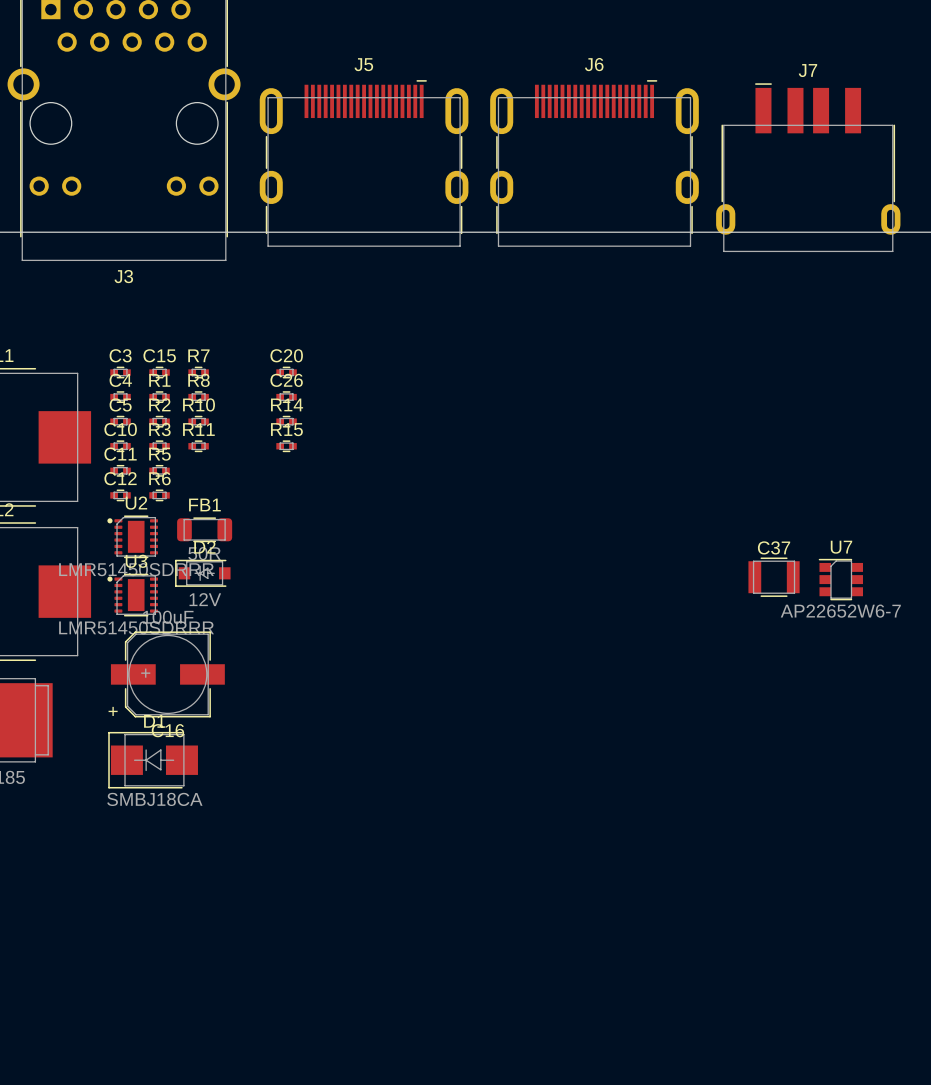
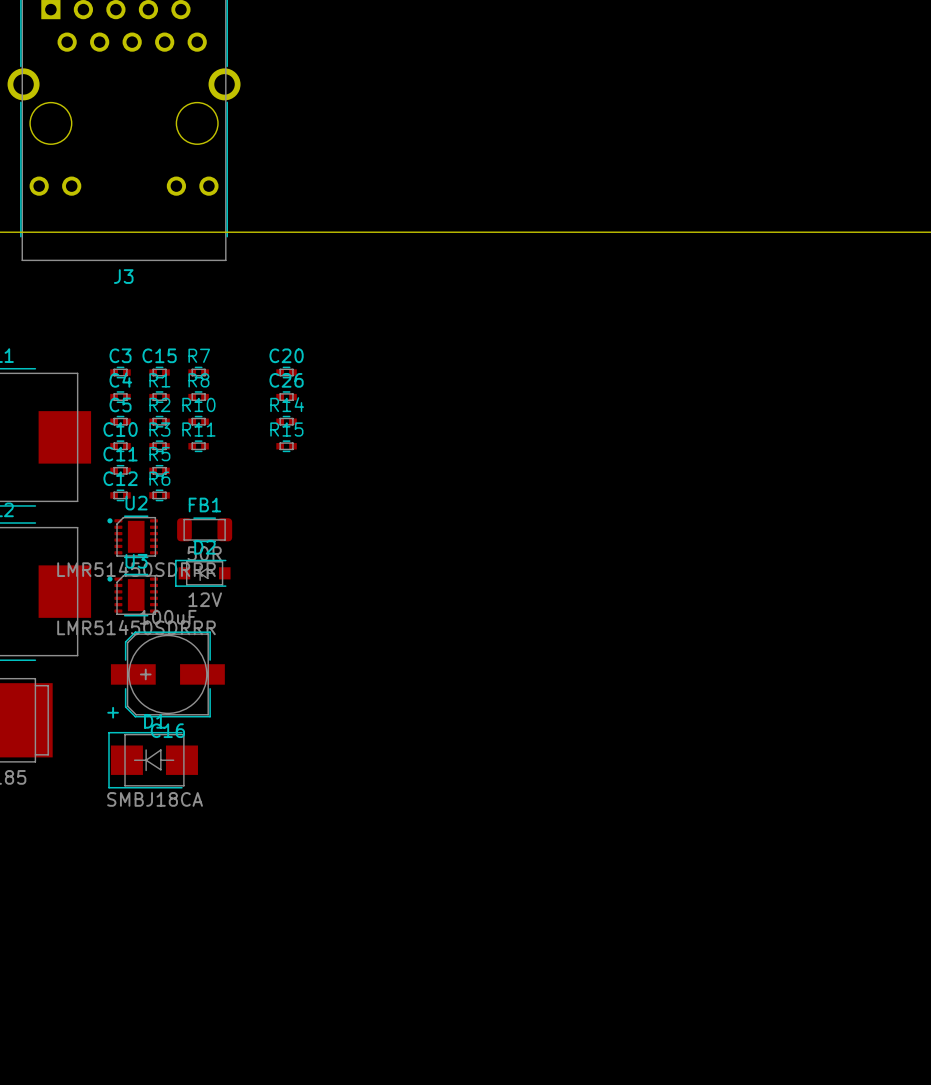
J5: (364, 163) -> none
J6: (594, 163) -> none
J7: (808, 167) -> none
C37: (774, 577) -> none
U7: AP22652W6-7 (840, 579) -> none

